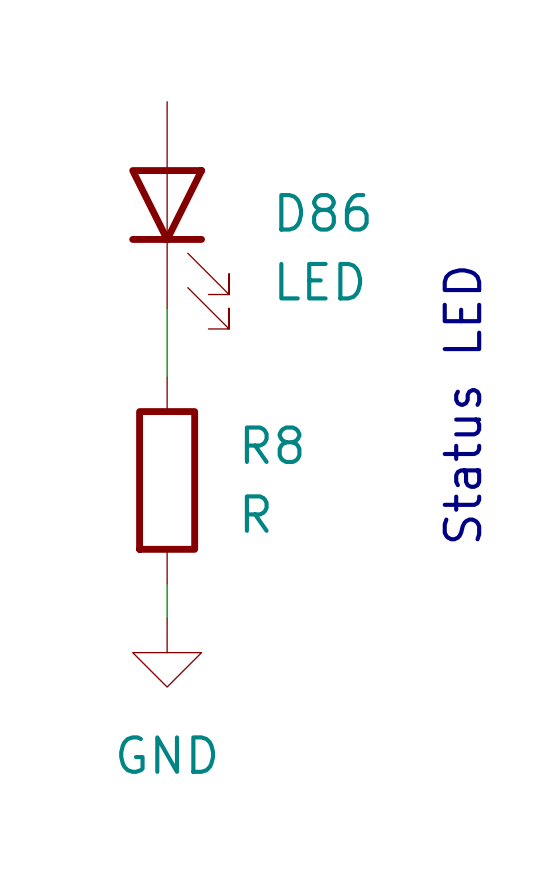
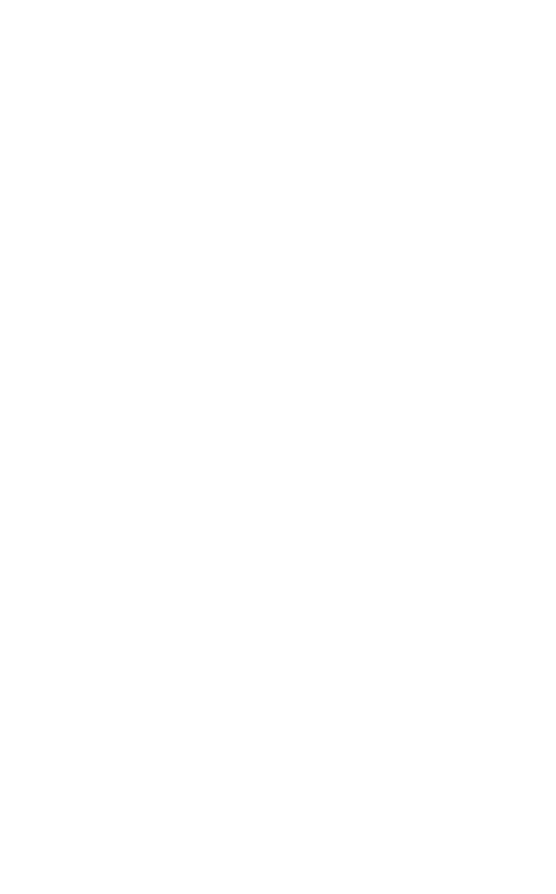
D86: LED (179, 215) -> none
wire: (167, 308) (167, 377) -> none
text: Status LED (461, 404) -> none
R8: R (167, 480) -> none
wire: (167, 583) (167, 618) -> none
power symbol: GND (167, 652) -> none

